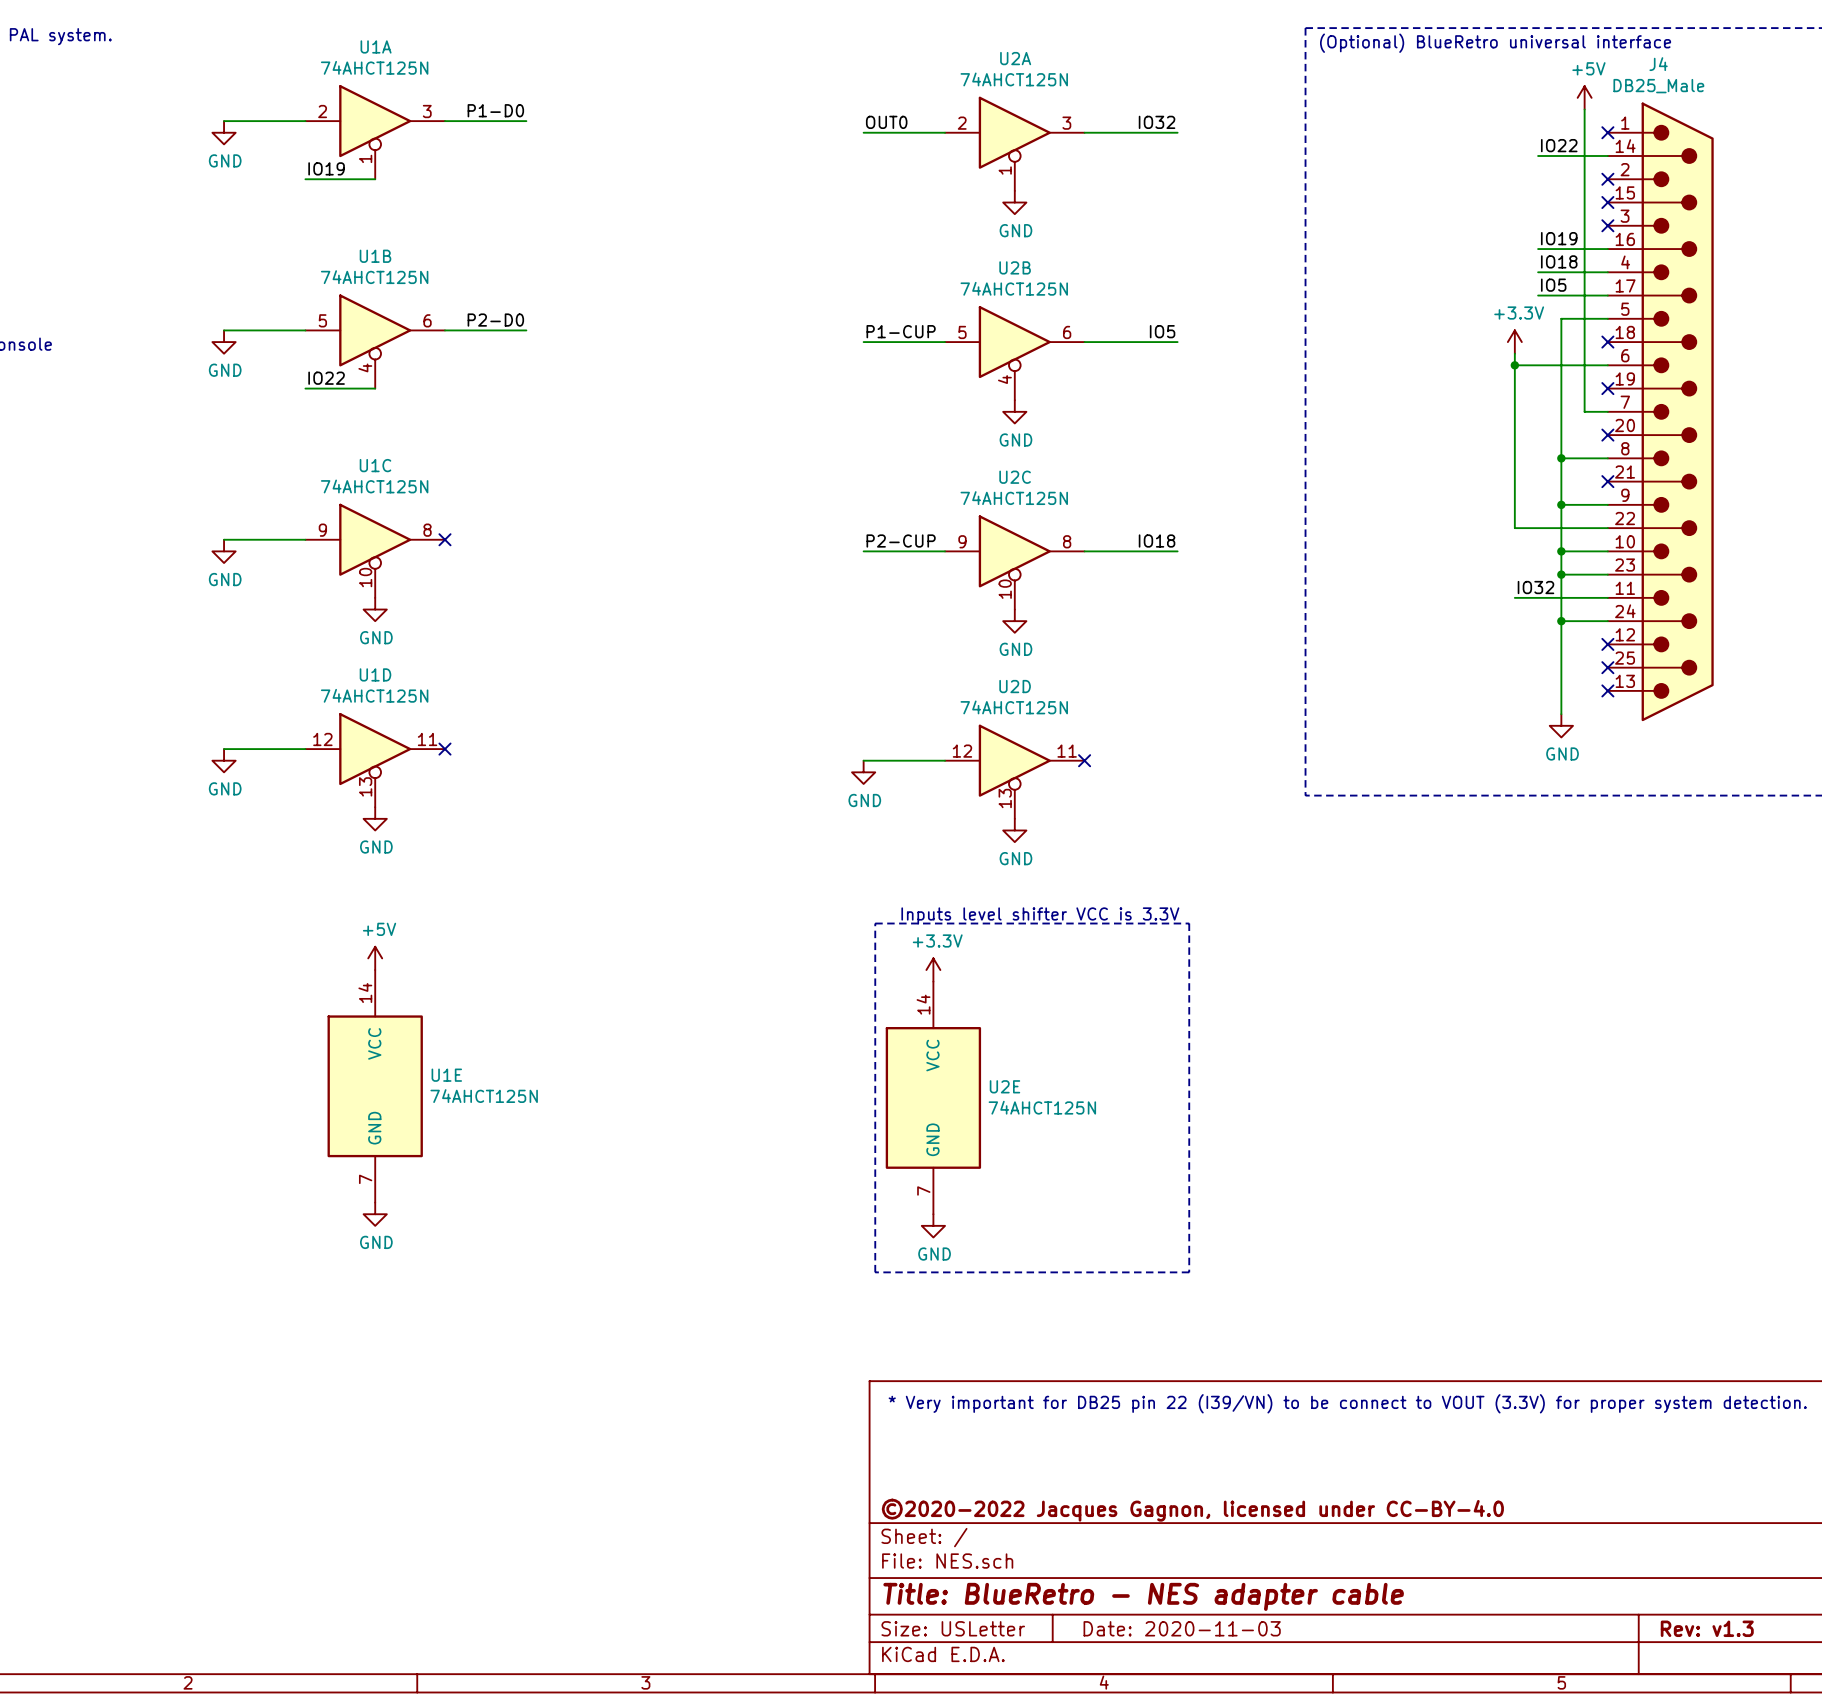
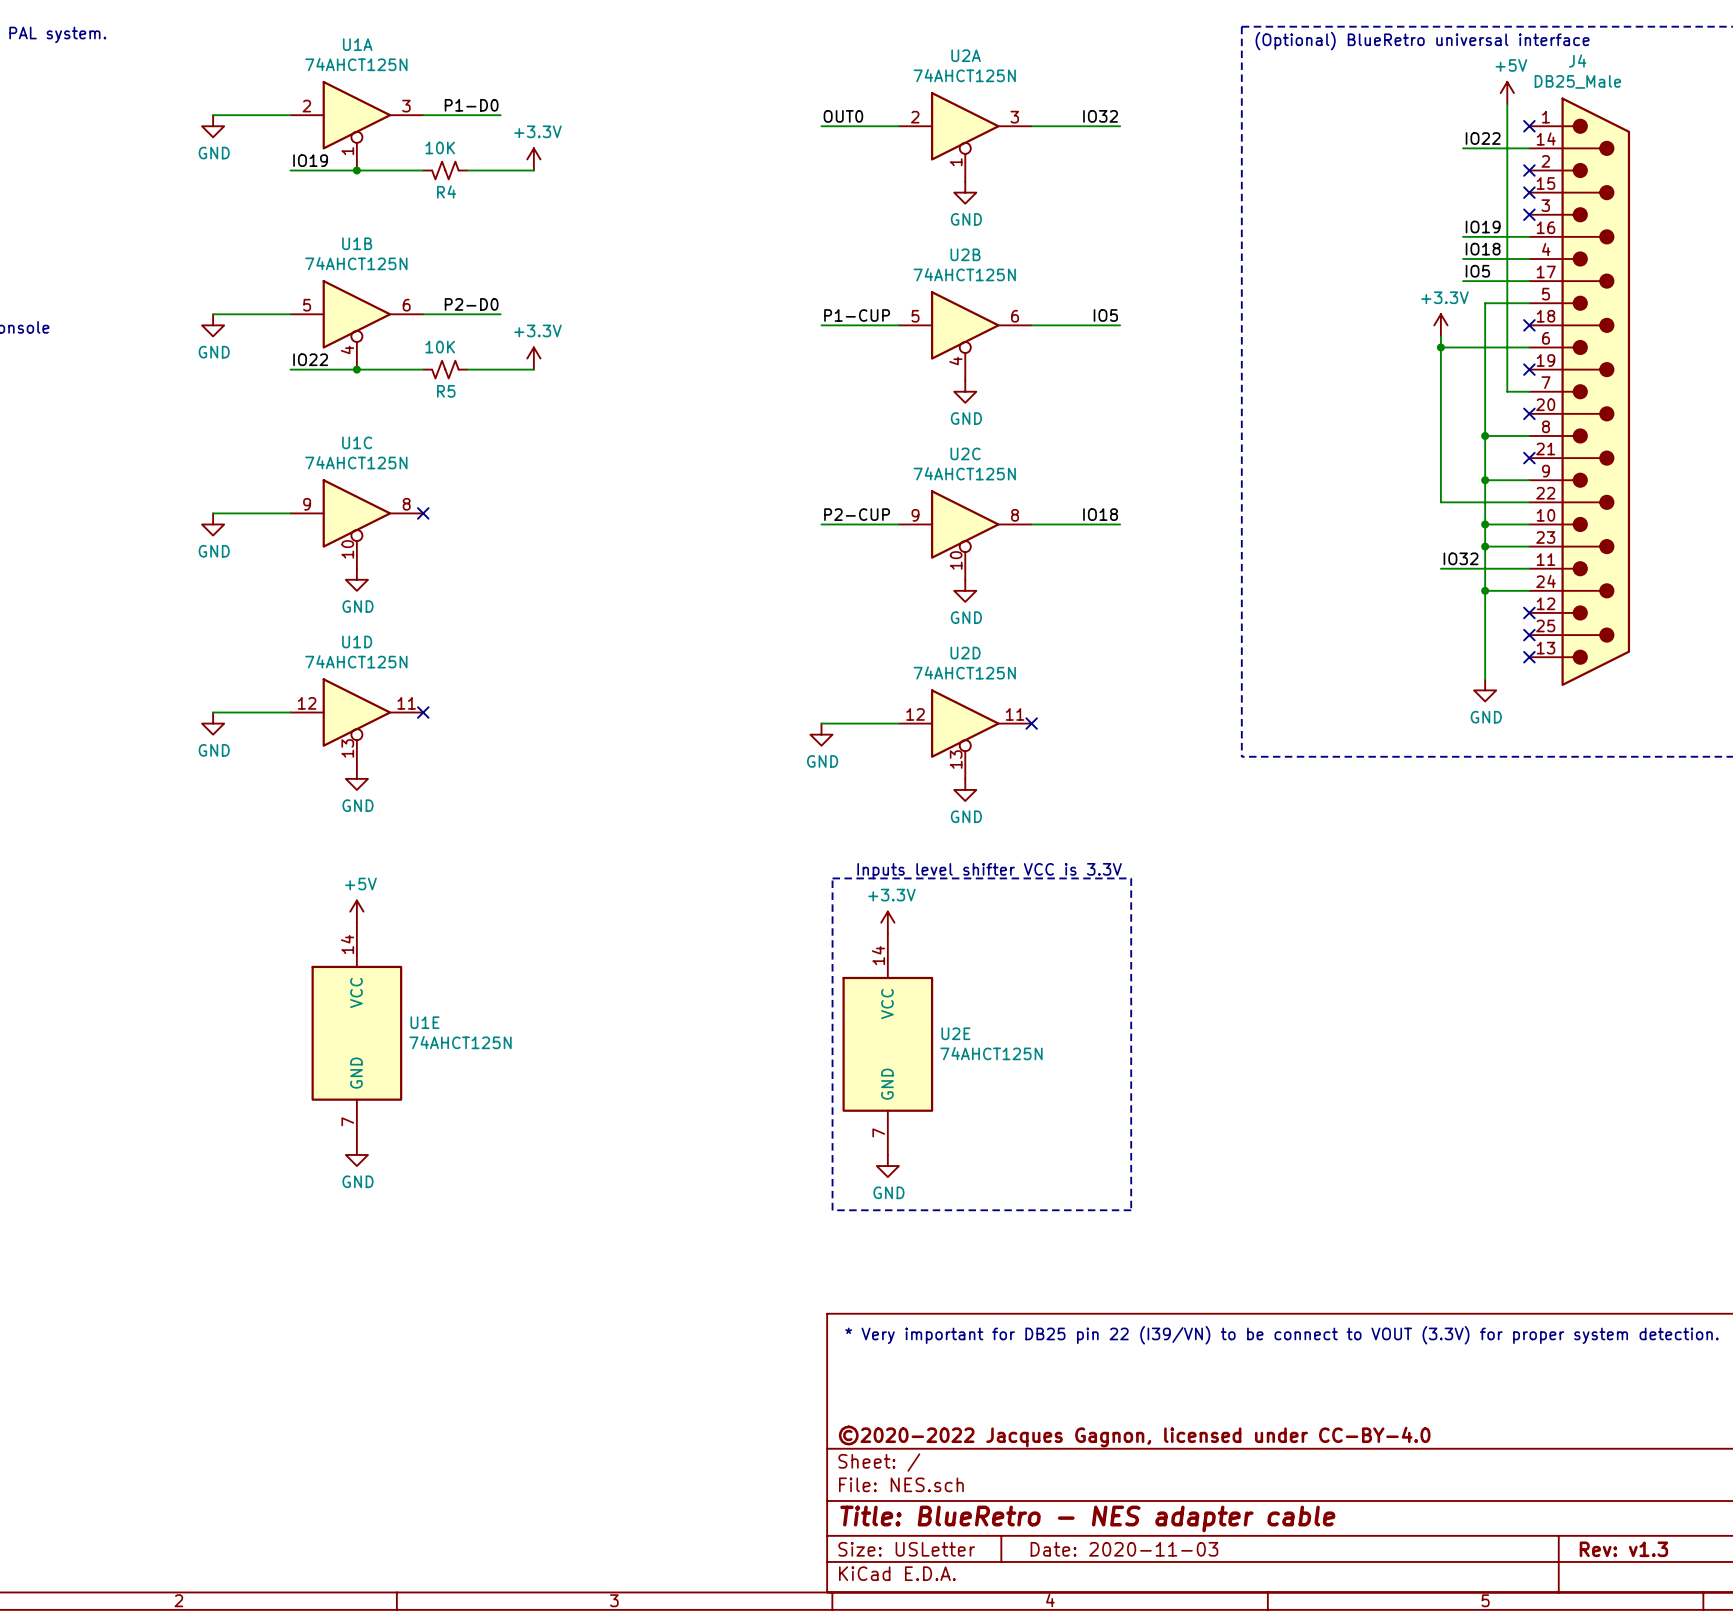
power symbol: none -> +3.3V (533, 159)
wire: none -> (356, 170) (423, 170)
junction: none -> (356, 170)
R4: none -> 10K (445, 170)
wire: none -> (467, 170) (533, 170)
power symbol: none -> +3.3V (533, 358)
wire: none -> (356, 369) (423, 369)
junction: none -> (356, 369)
R5: none -> 10K (445, 369)
wire: none -> (467, 369) (533, 369)

